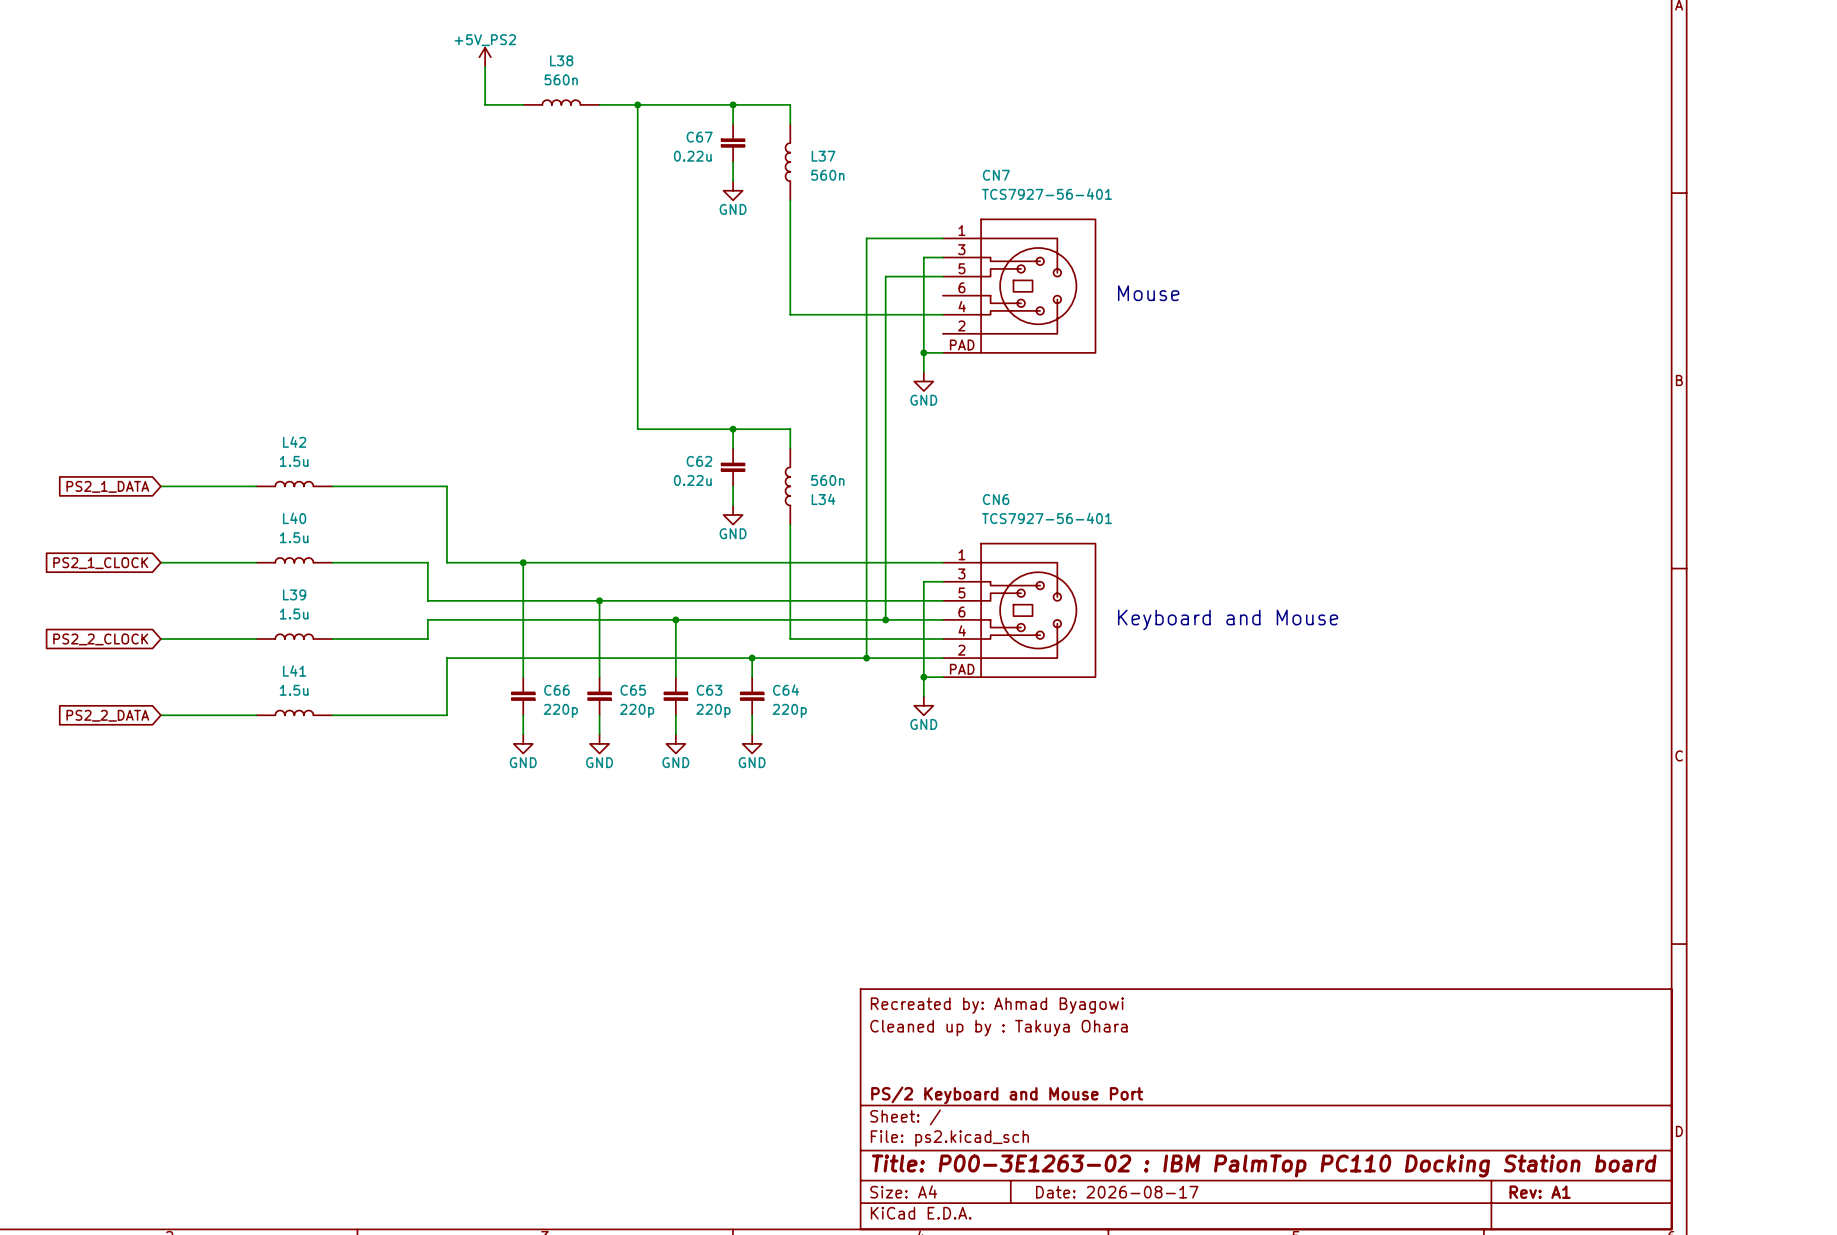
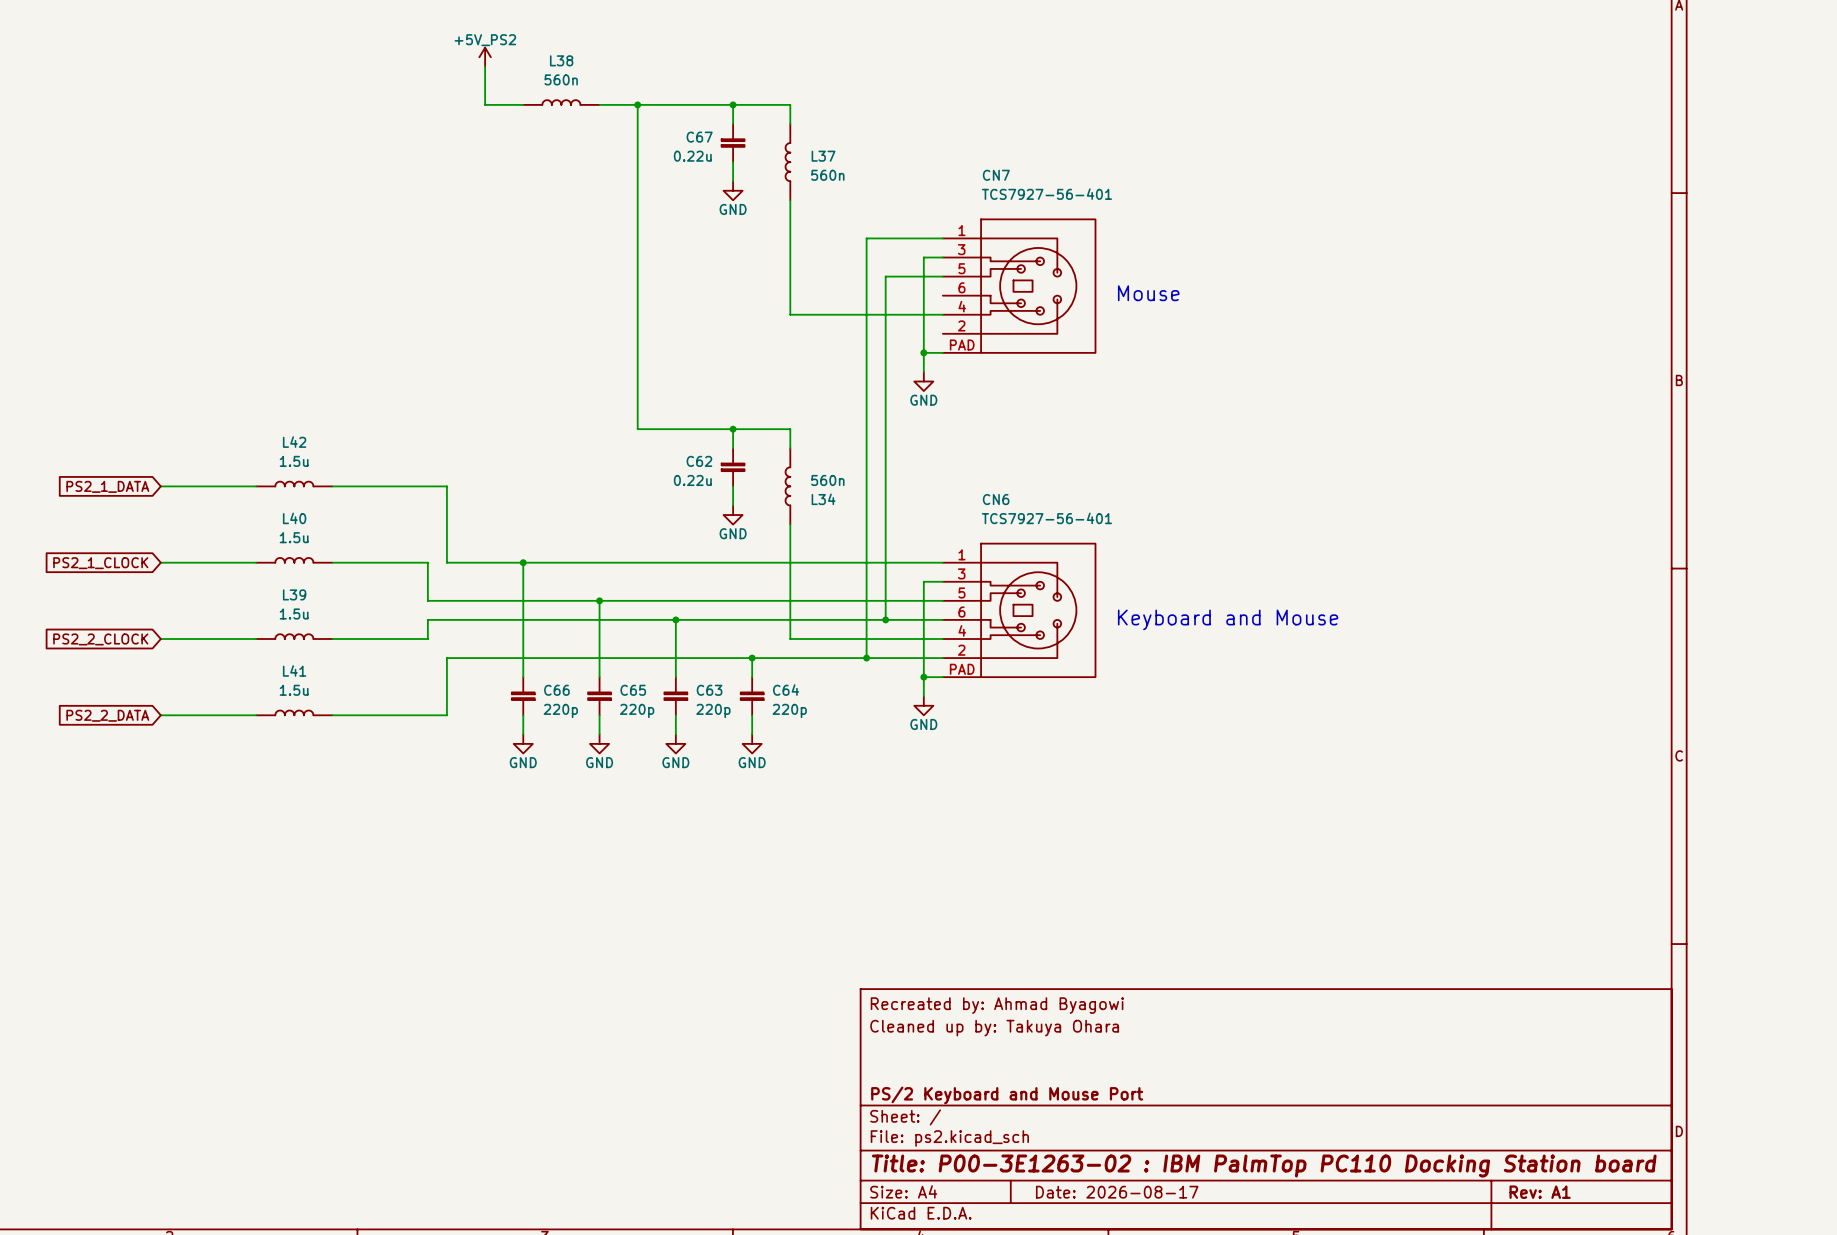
title block: Cleaned up by : Takuya Ohara (998, 1028) -> Cleaned up by: Takuya Ohara (994, 1028)

